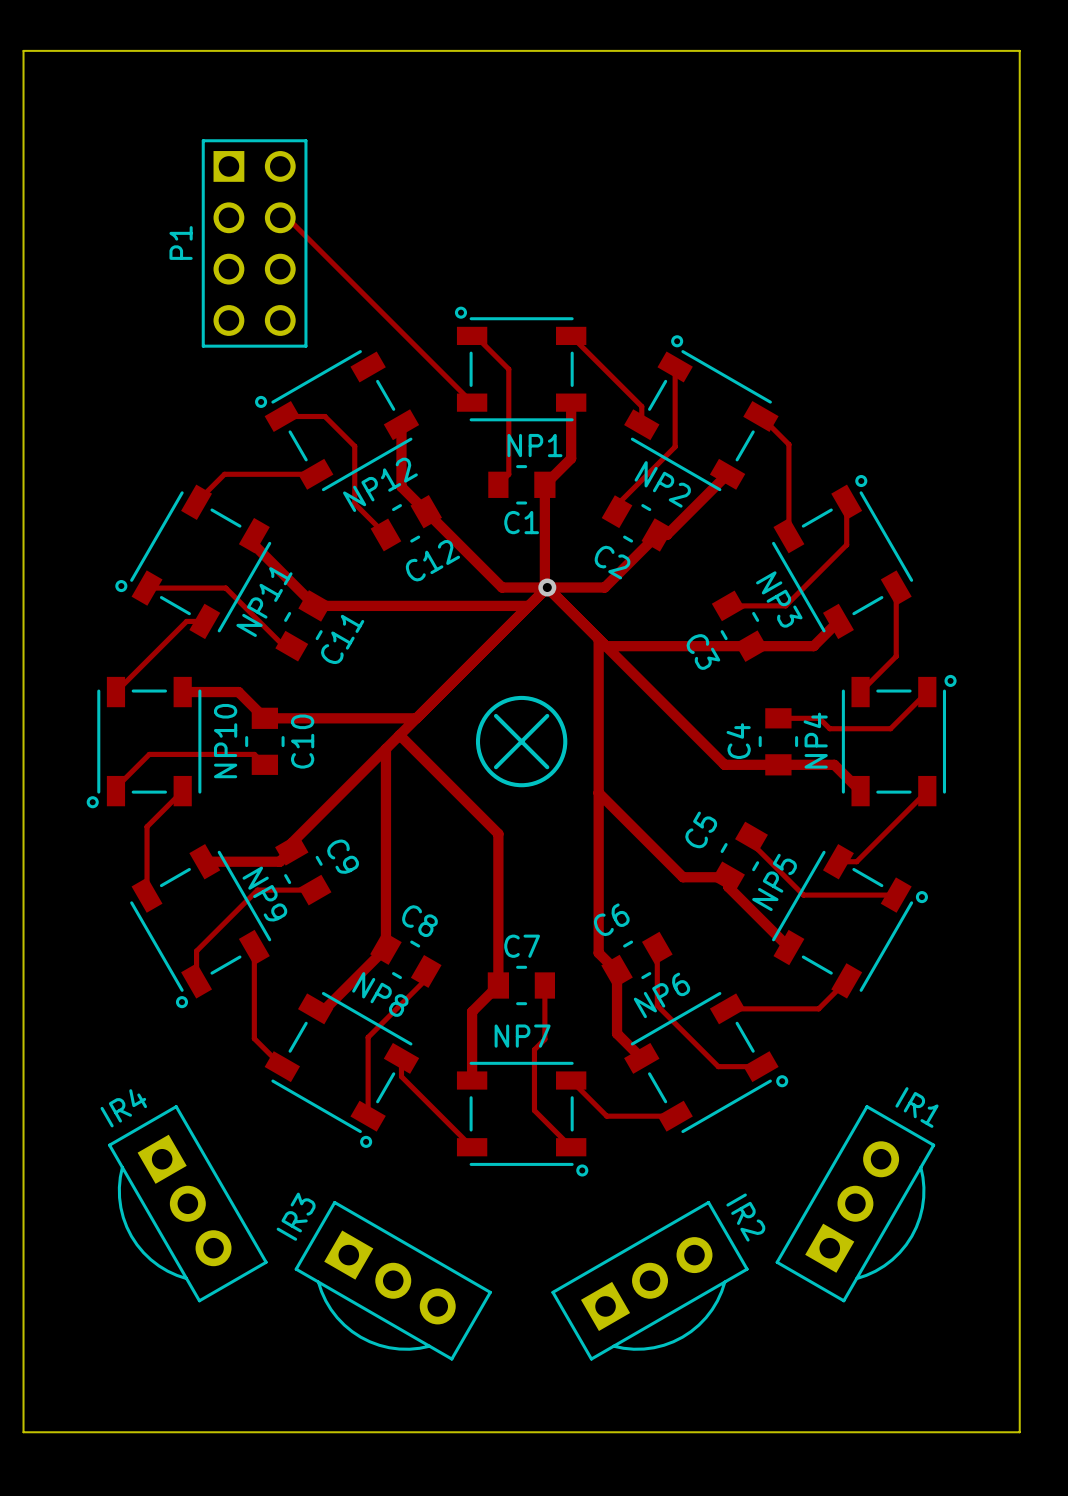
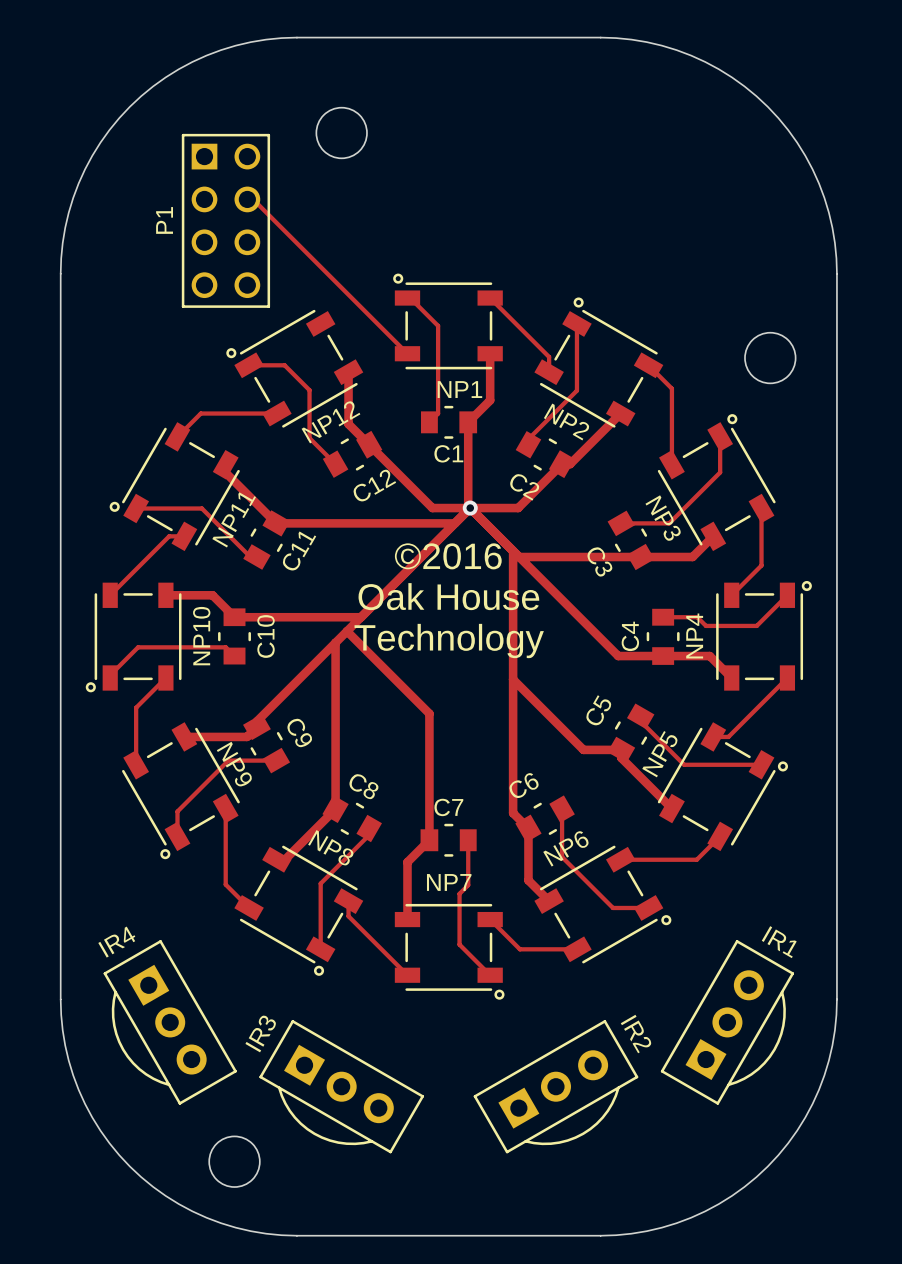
board edge: (23, 50) (23, 1432) (1019, 1432) (1019, 50) (23, 50) -> (296, 37) (266, 39) (221, 50) (192, 61) (153, 86) (119, 118) (100, 142) (78, 183) (65, 227) (60, 273) (60, 999) (65, 1045) (73, 1075) (85, 1103) (100, 1130) (119, 1155) (141, 1177) (165, 1195) (192, 1211) (235, 1227) (266, 1233) (296, 1235) (600, 1235) (631, 1233) (676, 1223) (705, 1211) (731, 1195) (756, 1177) (788, 1143) (805, 1117) (818, 1089) (828, 1060) (834, 1030) (836, 999) (836, 273) (832, 227) (824, 197) (812, 169) (797, 142) (767, 106) (731, 77) (705, 61) (676, 50) (646, 42) (616, 38) (296, 37)
round board edge: none -> [315, 106, 368, 160]
round board edge: none -> [744, 331, 797, 385]
text: none -> ©2016 (448, 556)
text: none -> Oak House (448, 596)
drawing: [475, 695, 568, 788] -> none
line: (495, 715) (547, 767) -> none
line: (547, 715) (495, 767) -> none
text: none -> Technology (449, 641)
round board edge: none -> [208, 1135, 261, 1188]

